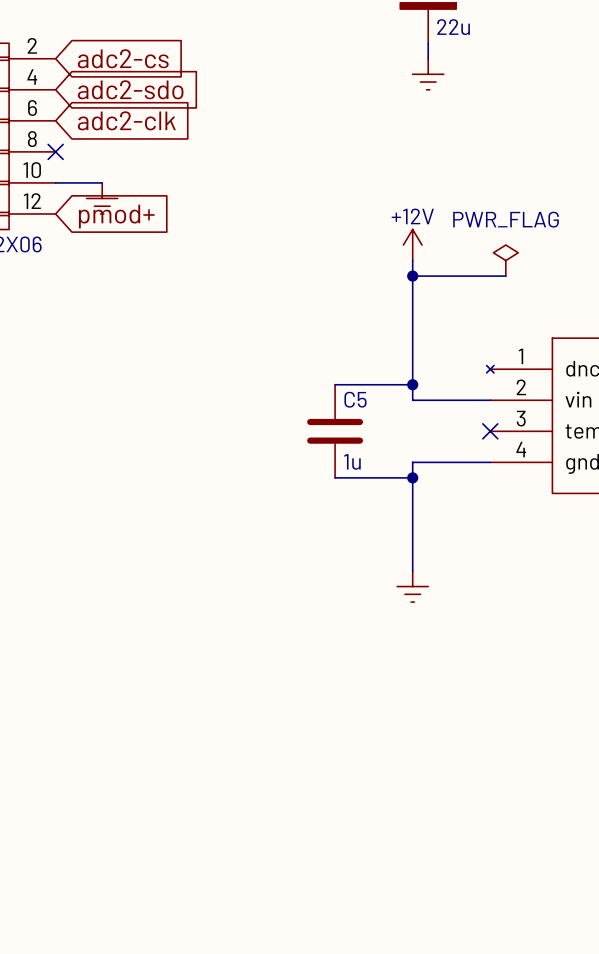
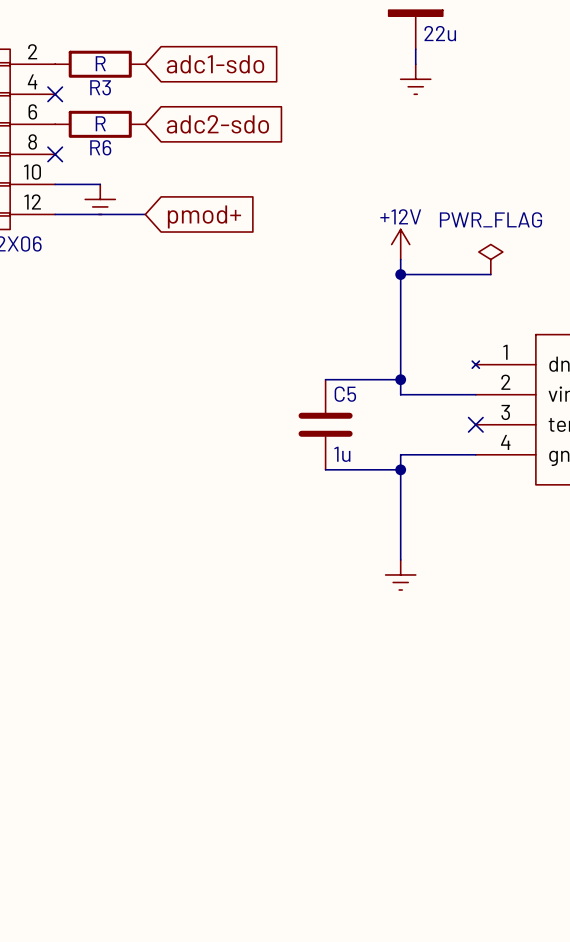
R3: none -> R (100, 64)
global label: adc2-cs (123, 58) -> adc1-sdo (215, 64)
no-connect mark: none -> (55, 94)
global label position: adc2-sdo (130, 89) -> adc2-sdo (217, 124)
R6: none -> R (100, 124)
global label: adc2-clk (126, 120) -> none
wire: none -> (55, 214) (145, 214)
global label position: pmod+ (116, 216) -> pmod+ (204, 216)

